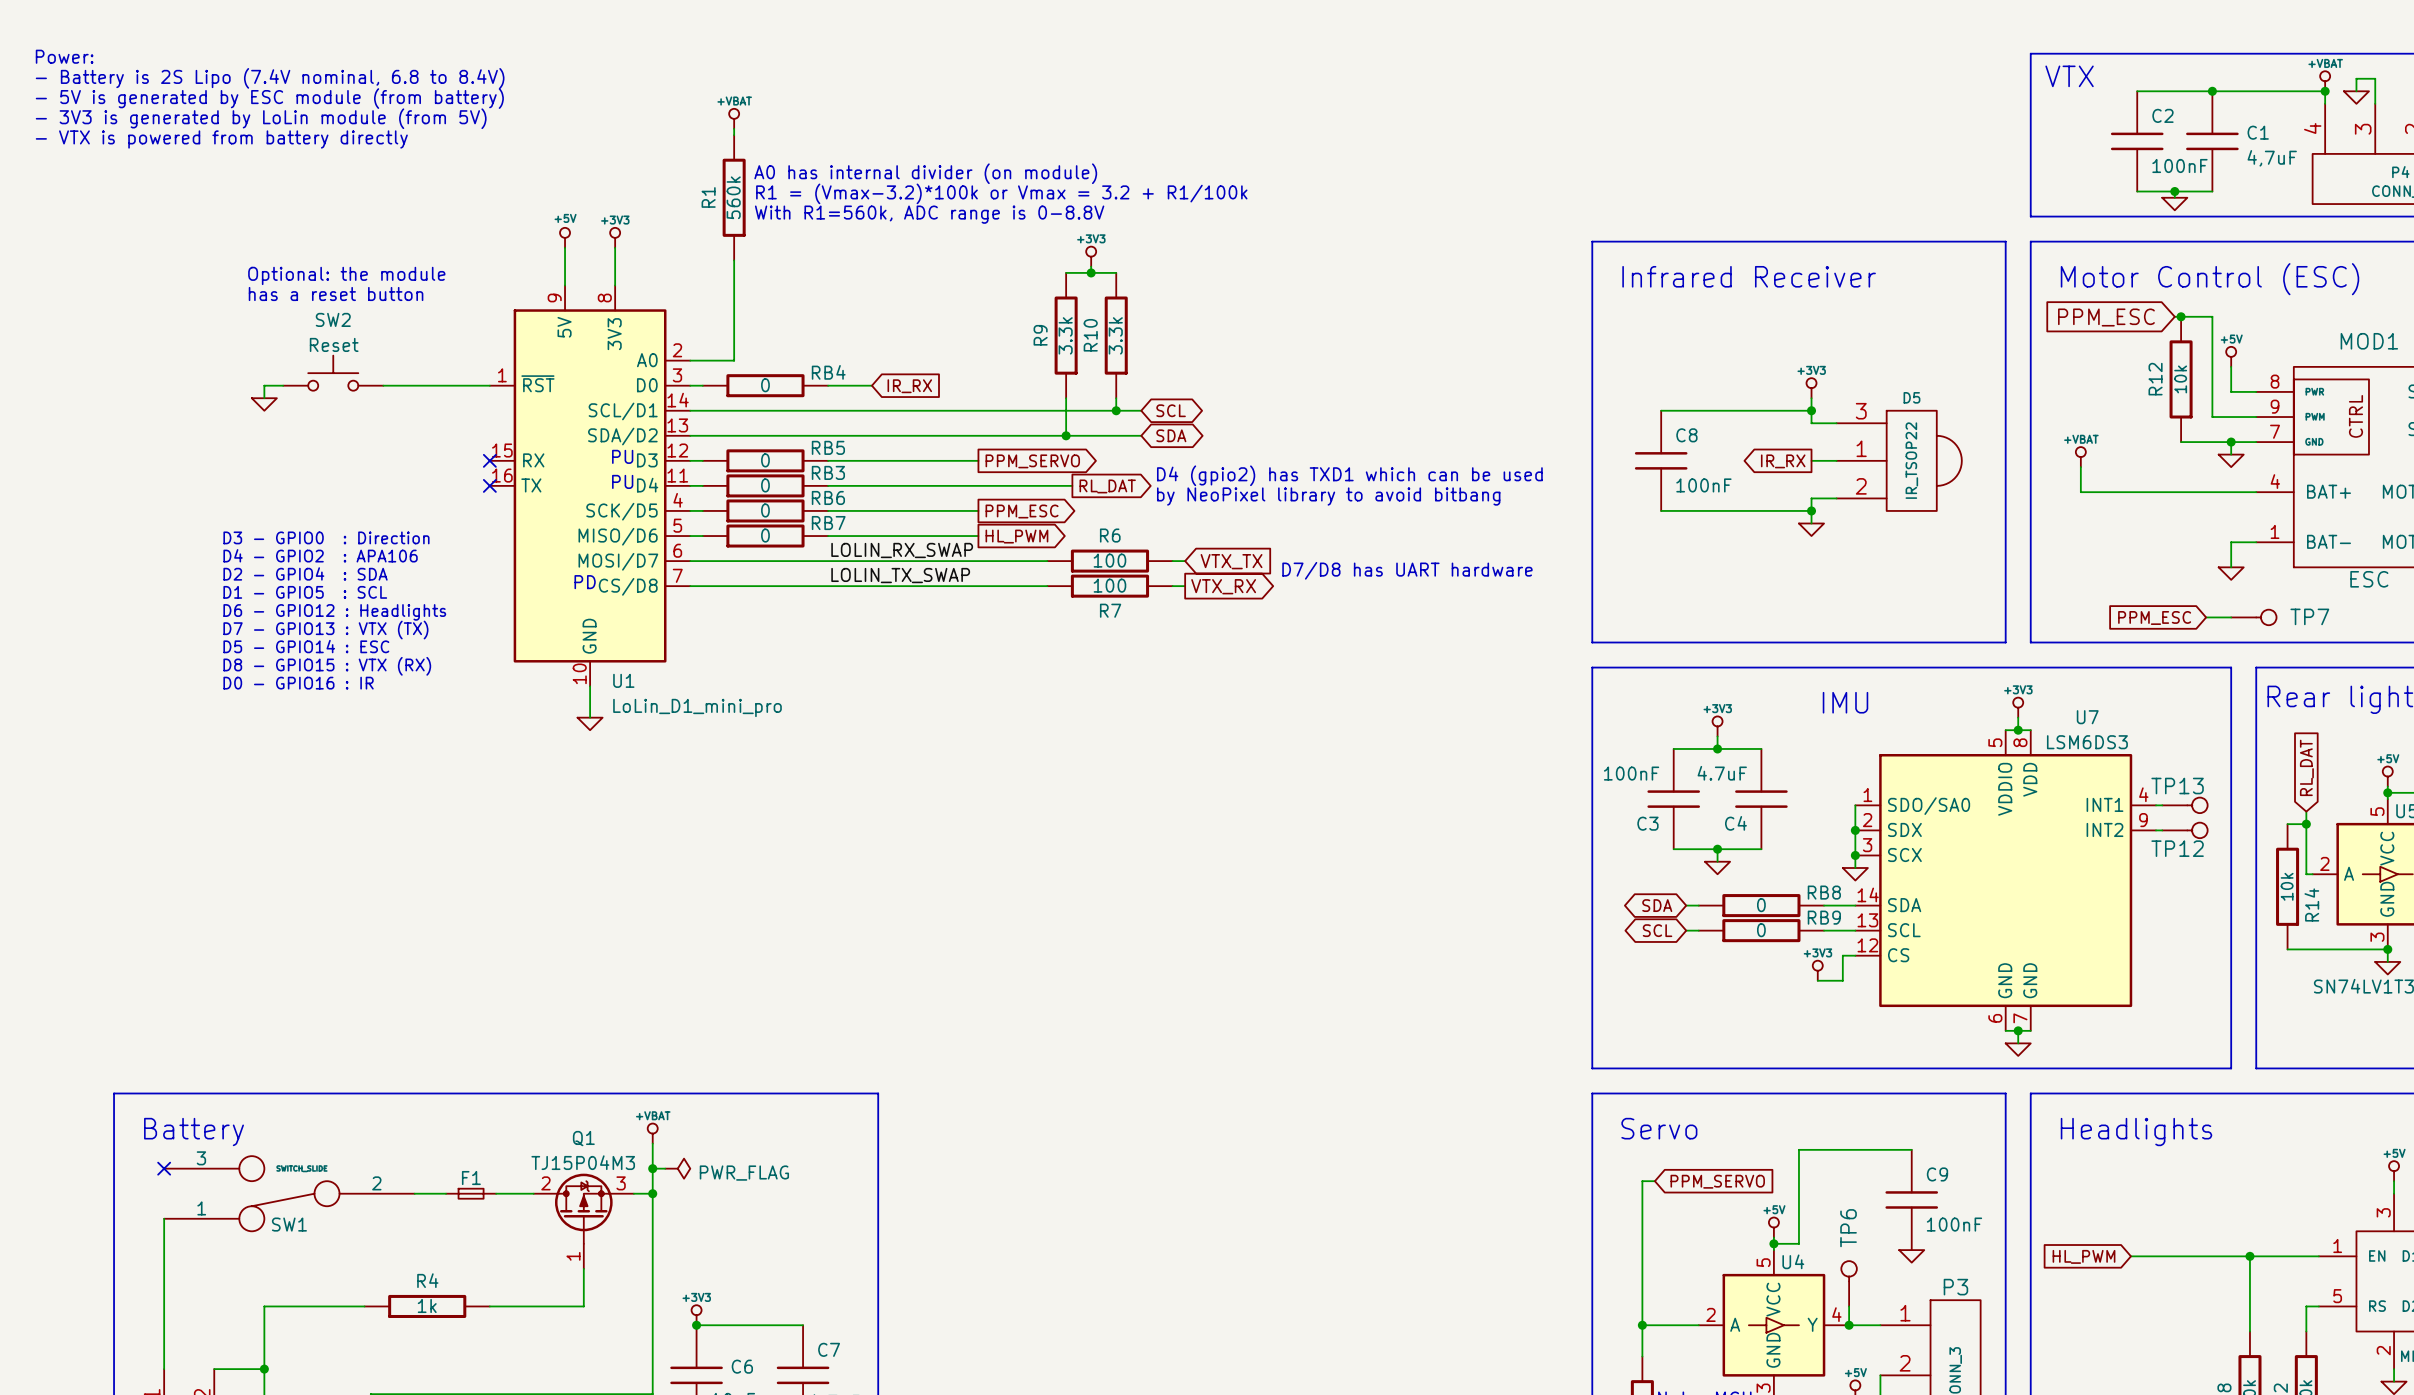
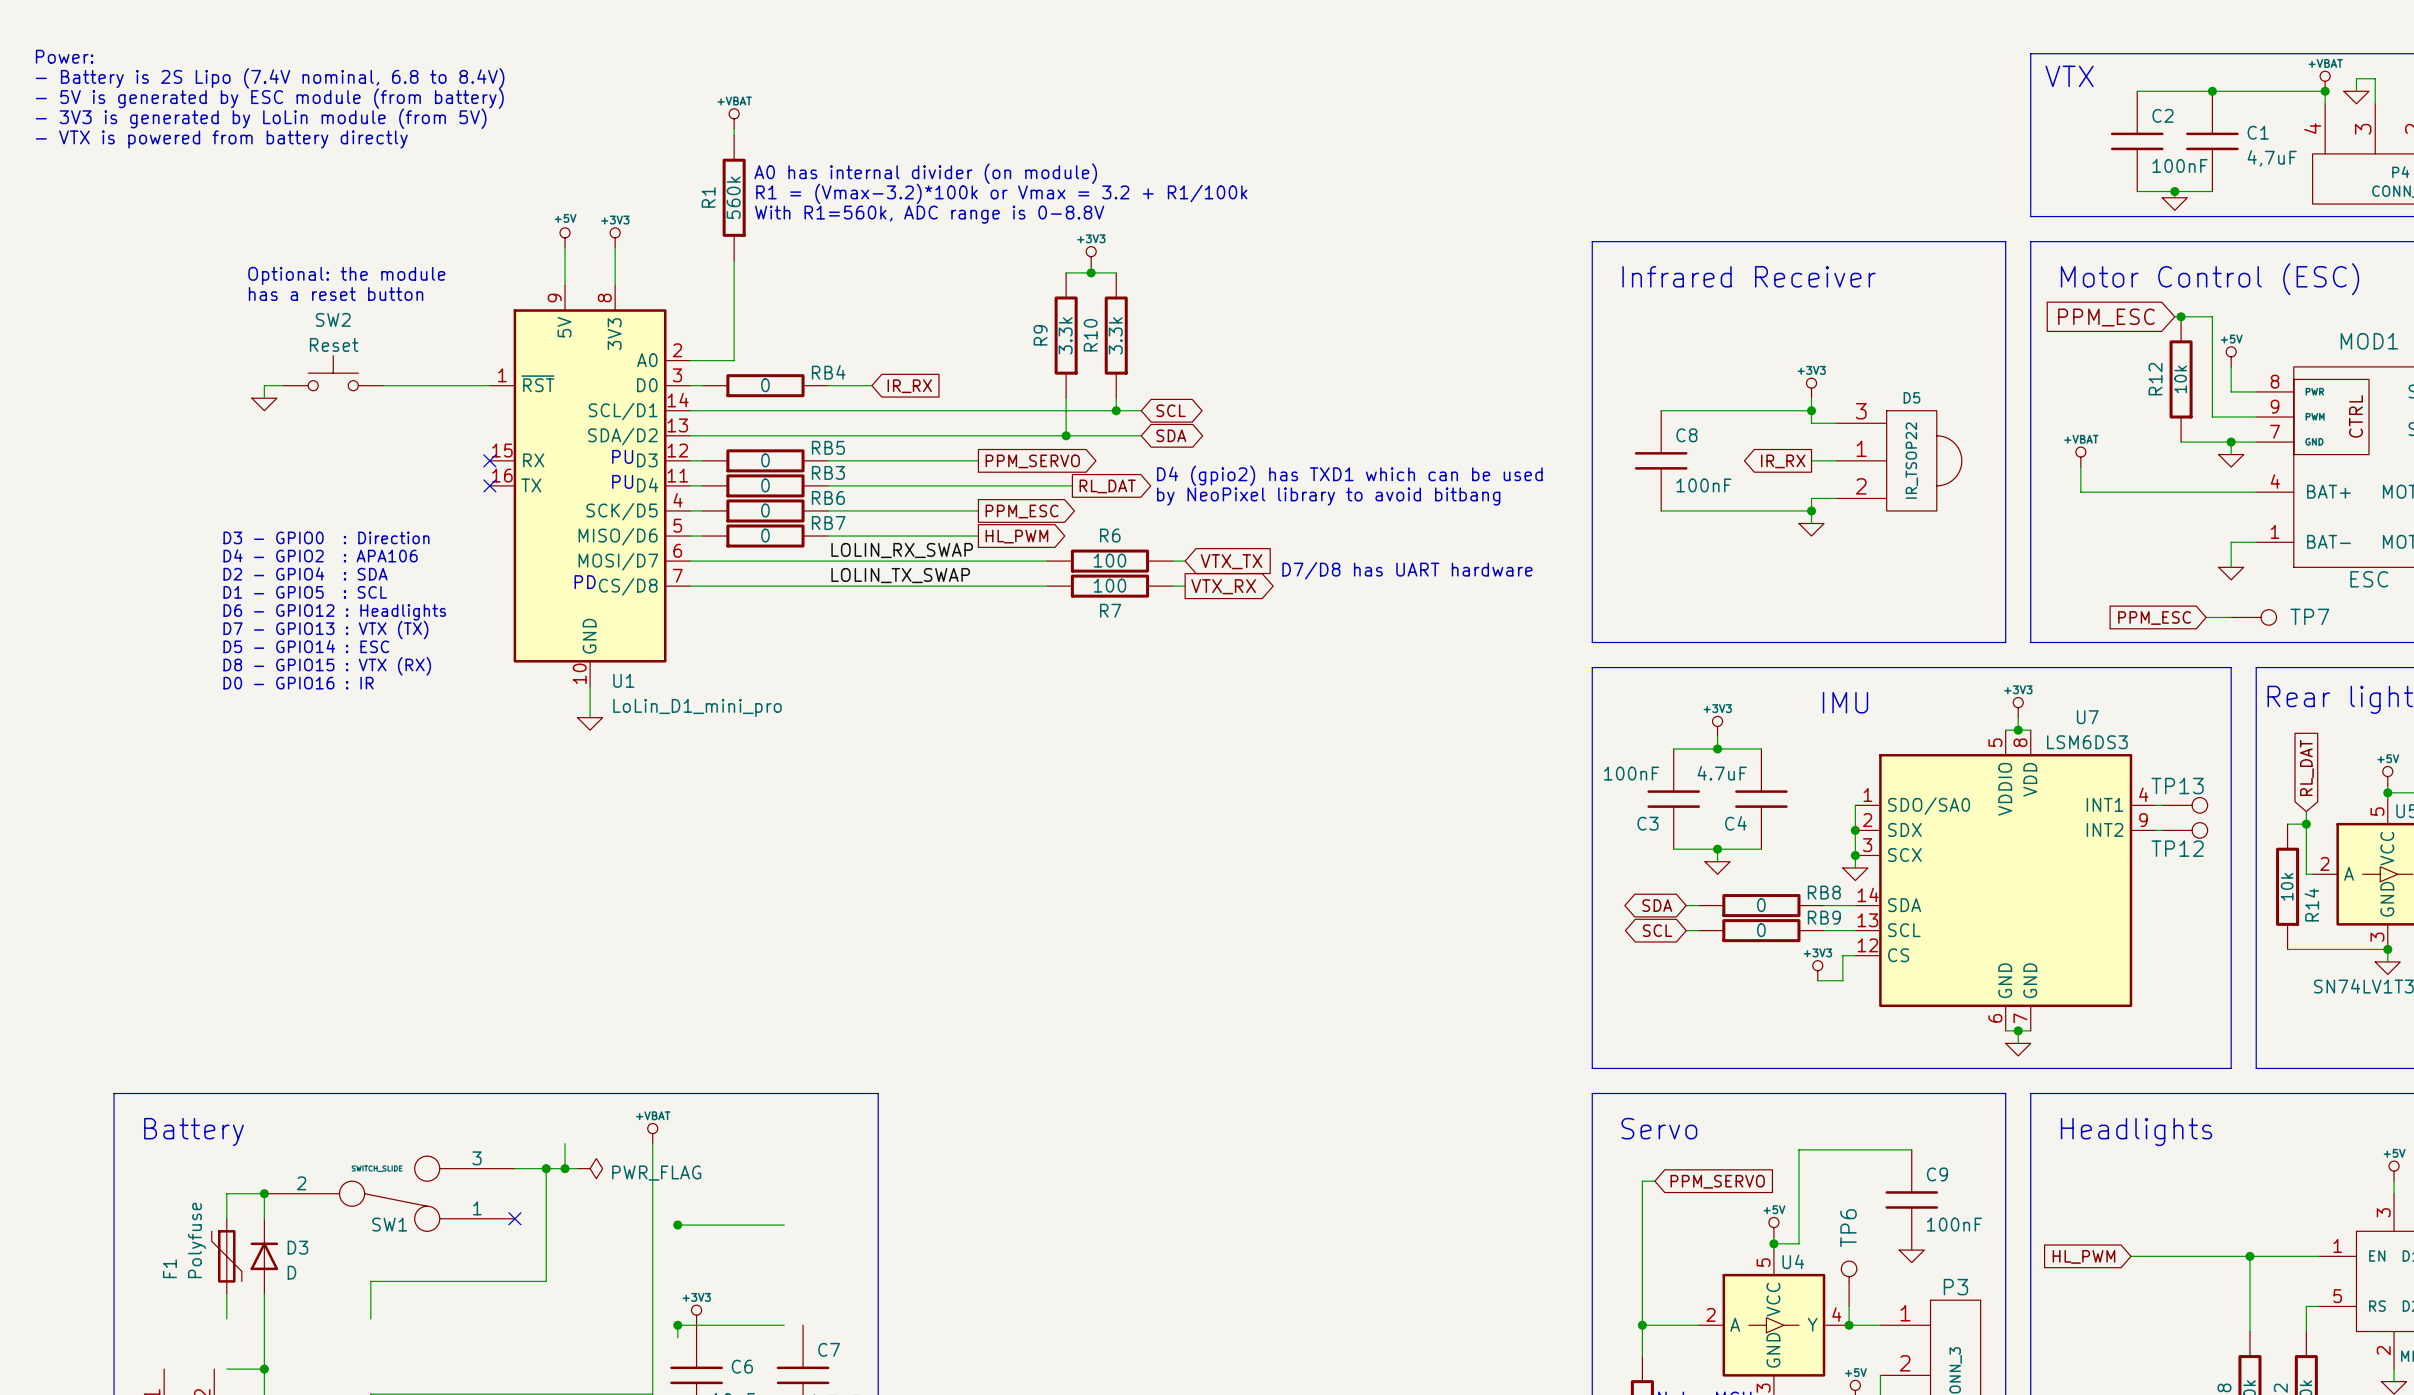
wire: none -> (565, 1143) (565, 1168)
no-connect mark: (164, 1168) -> none
wire: none -> (514, 1168) (577, 1168)
wire: none -> (546, 1168) (546, 1281) (370, 1281) (370, 1318)
junction: none -> (546, 1168)
junction: none -> (565, 1168)
wire: (652, 1168) (665, 1168) -> none
junction: (652, 1168) -> none
power symbol position: PWR_FLAG (677, 1168) -> PWR_FLAG (590, 1168)
F1 name position: F1 (471, 1178) -> F1 (169, 1268)
F1 symbol: [446, 1188, 497, 1199] -> [211, 1218, 242, 1294]
junction: none -> (264, 1193)
SW1 flip: as is (289, 1193) -> left-right (389, 1193)
wire: (414, 1193) (446, 1193) -> none
wire: (496, 1193) (533, 1193) -> none
wire: (633, 1193) (652, 1193) -> none
junction: (652, 1193) -> none
wire: (164, 1218) (164, 1369) -> none
wire: none -> (226, 1218) (226, 1193) (264, 1193) (264, 1218)
no-connect mark: none -> (514, 1218)
Q1: TJ15P04M3 (583, 1221) -> none
wire: none -> (677, 1225) (784, 1225)
junction: none -> (677, 1225)
F1 value: none -> Polyfuse (197, 1240)
D3: none -> D (264, 1256)
wire: (583, 1268) (583, 1306) (489, 1306) -> none
wire: none -> (226, 1293) (226, 1318)
wire: (264, 1306) (364, 1306) -> (264, 1306) (264, 1293)
R4: 1k (427, 1306) -> none
wire: none -> (696, 1325) (677, 1325) (677, 1337)
junction position: (696, 1325) -> (677, 1325)
wire: (784, 1325) (803, 1325) -> none
wire: (214, 1369) (226, 1369) -> none

